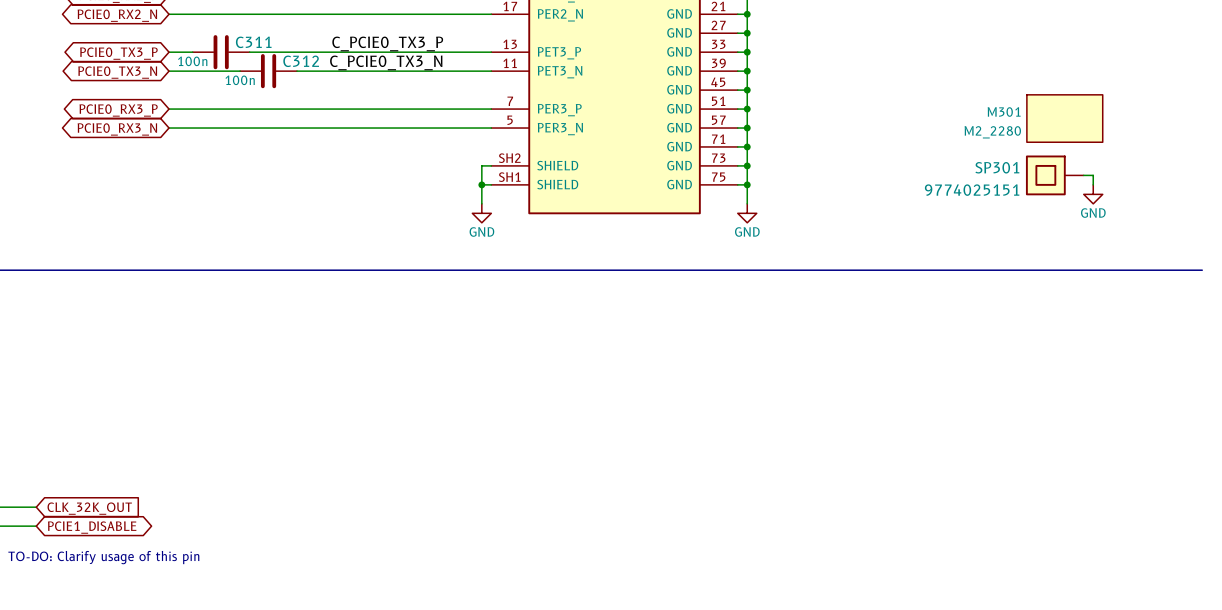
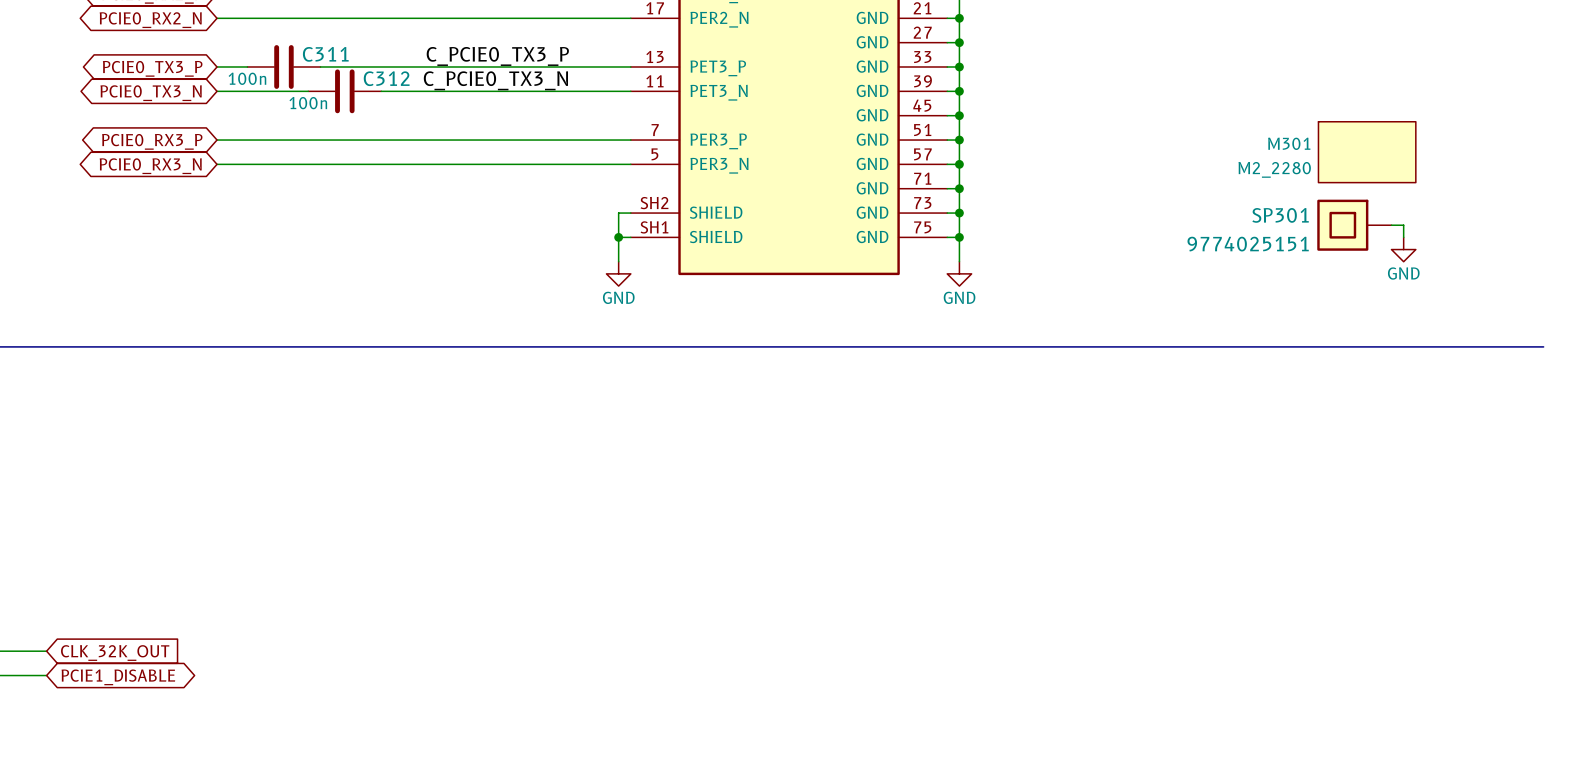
text: TO-DO: Clarify usage of this pin (103, 557) -> none

